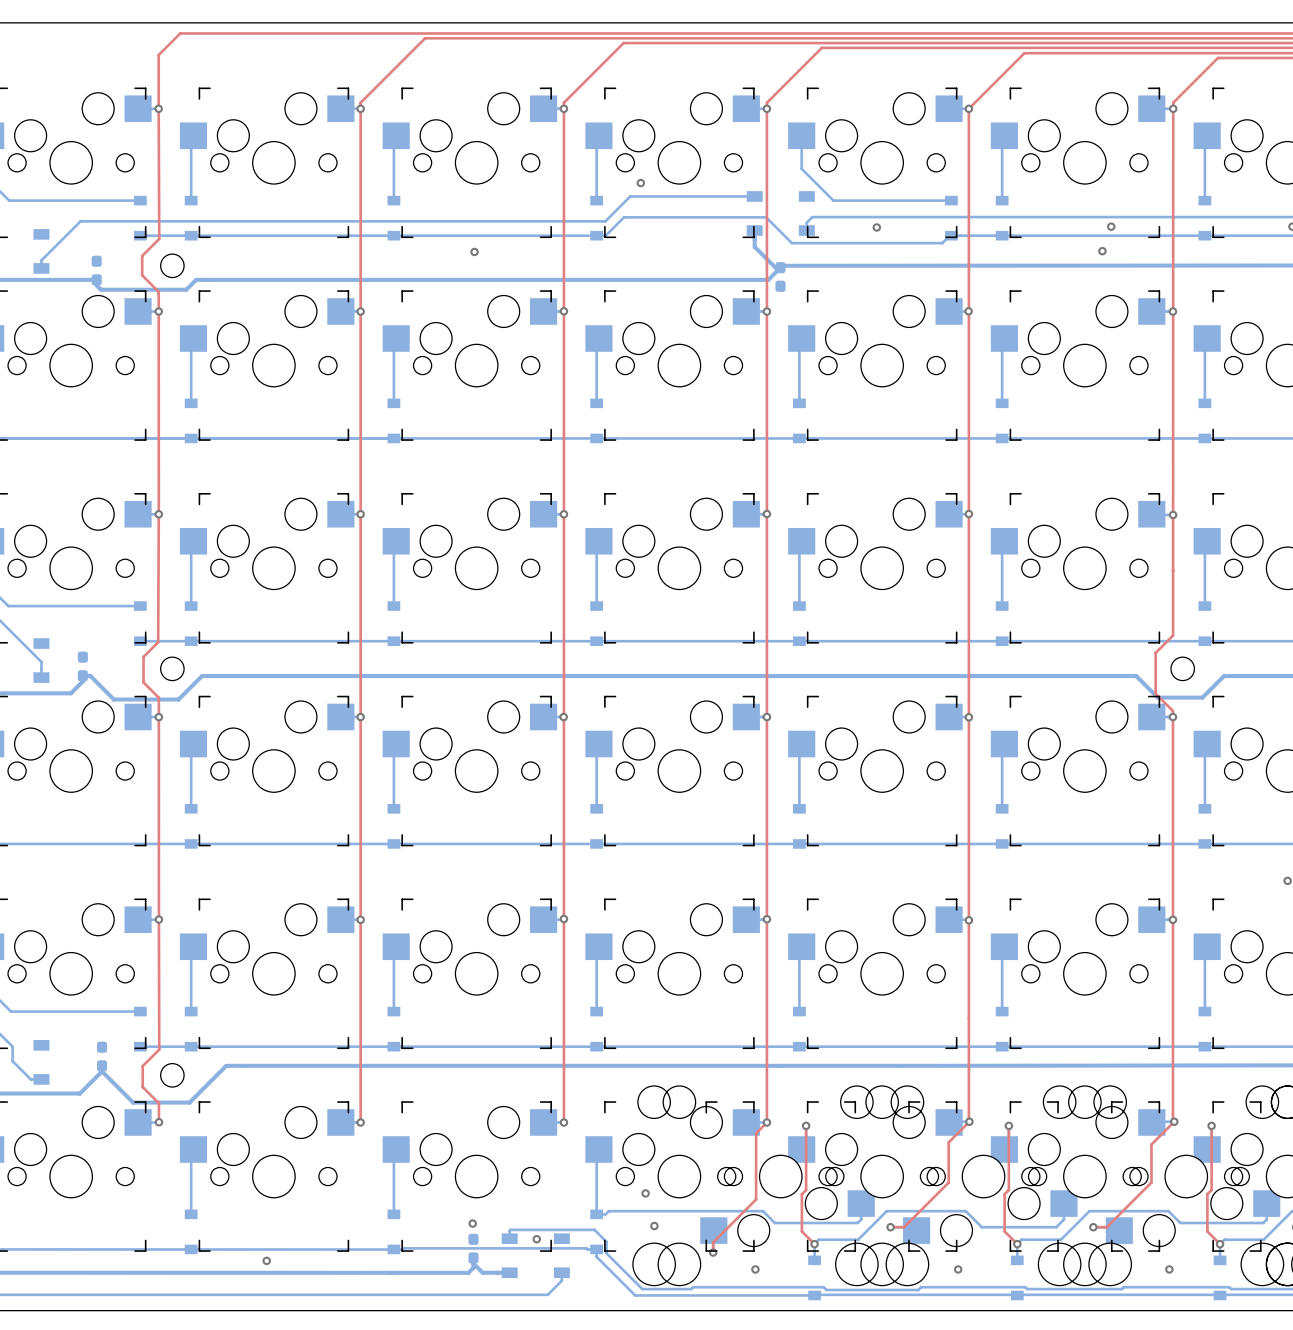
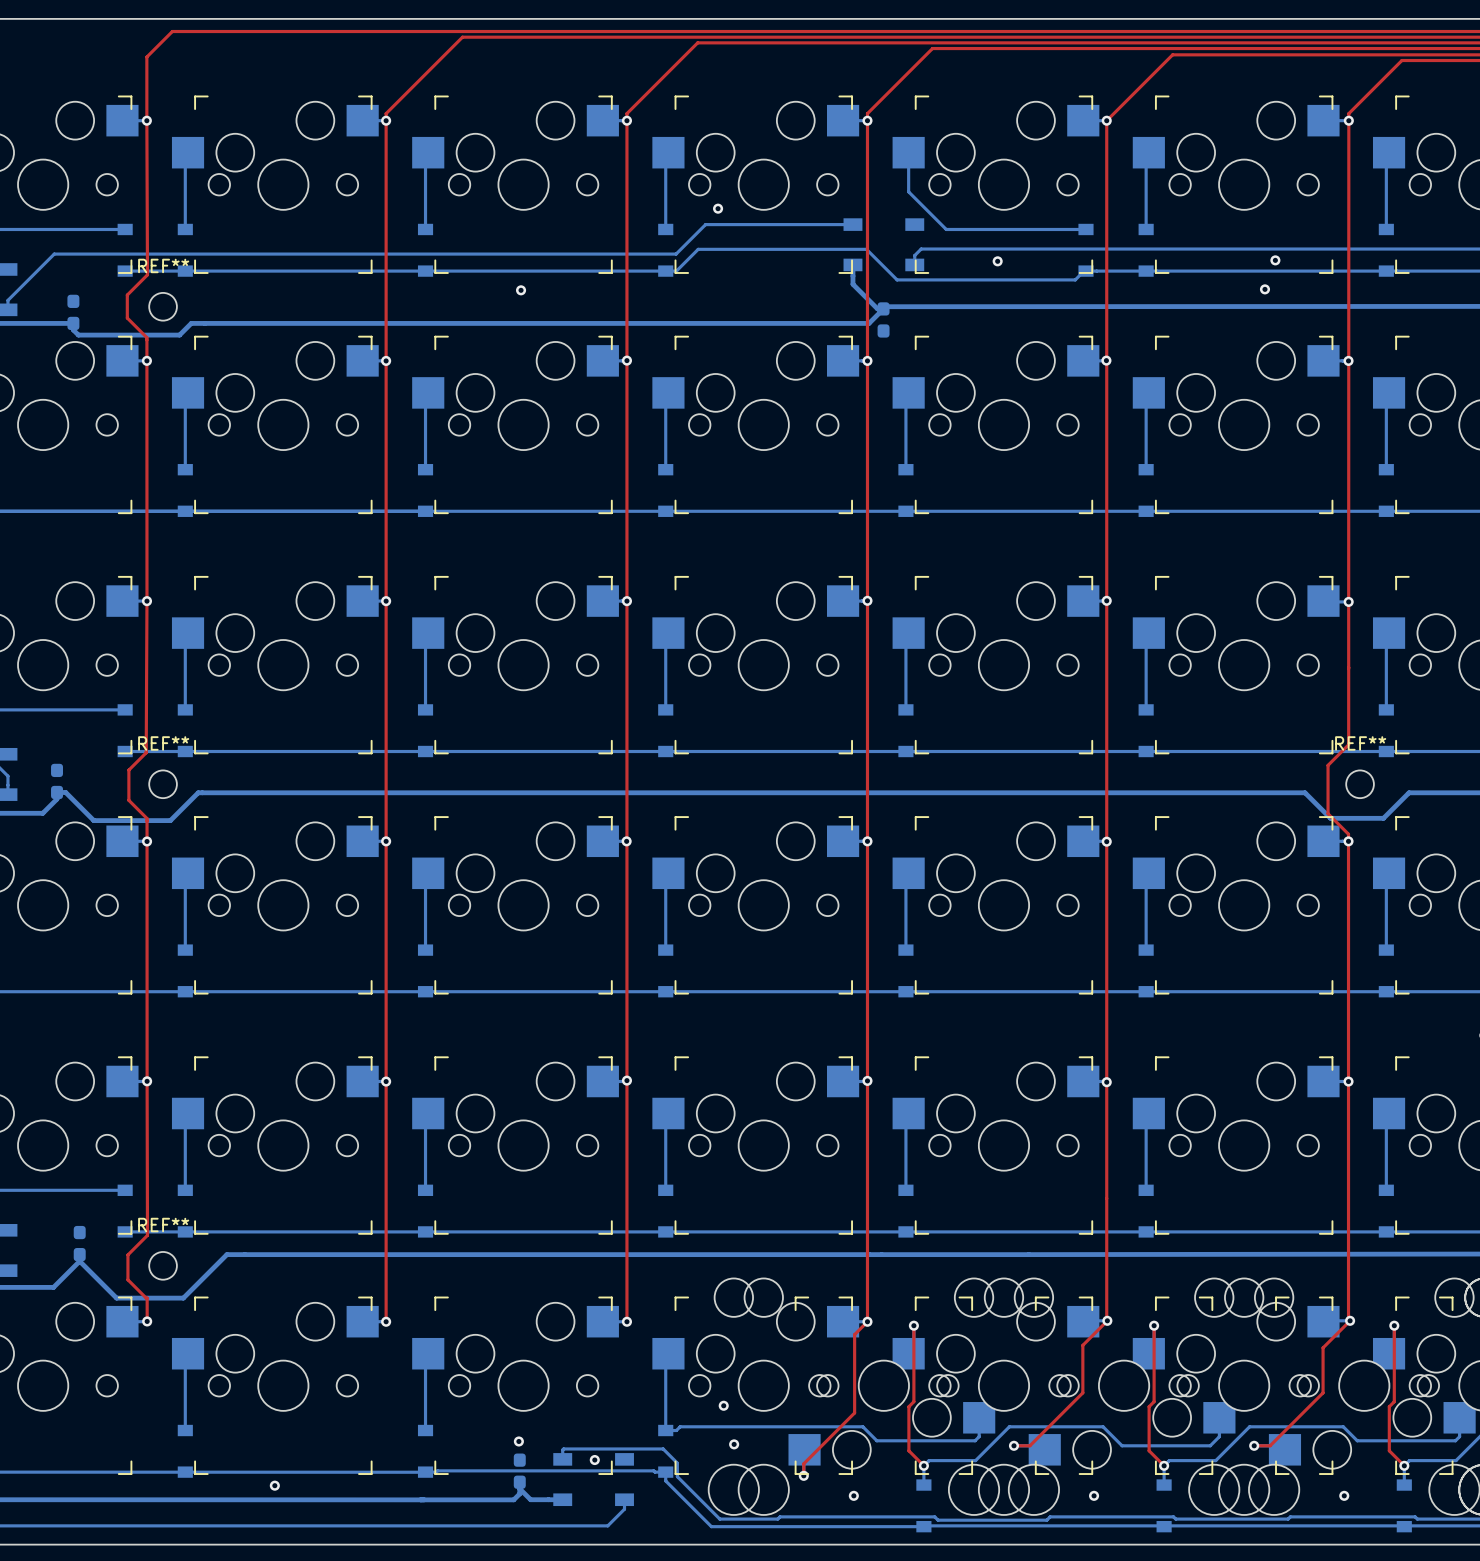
REF** name: none -> REF** (163, 265)
REF** name: none -> REF** (163, 743)
REF** name: none -> REF** (1360, 743)
REF** name: none -> REF** (163, 1225)

